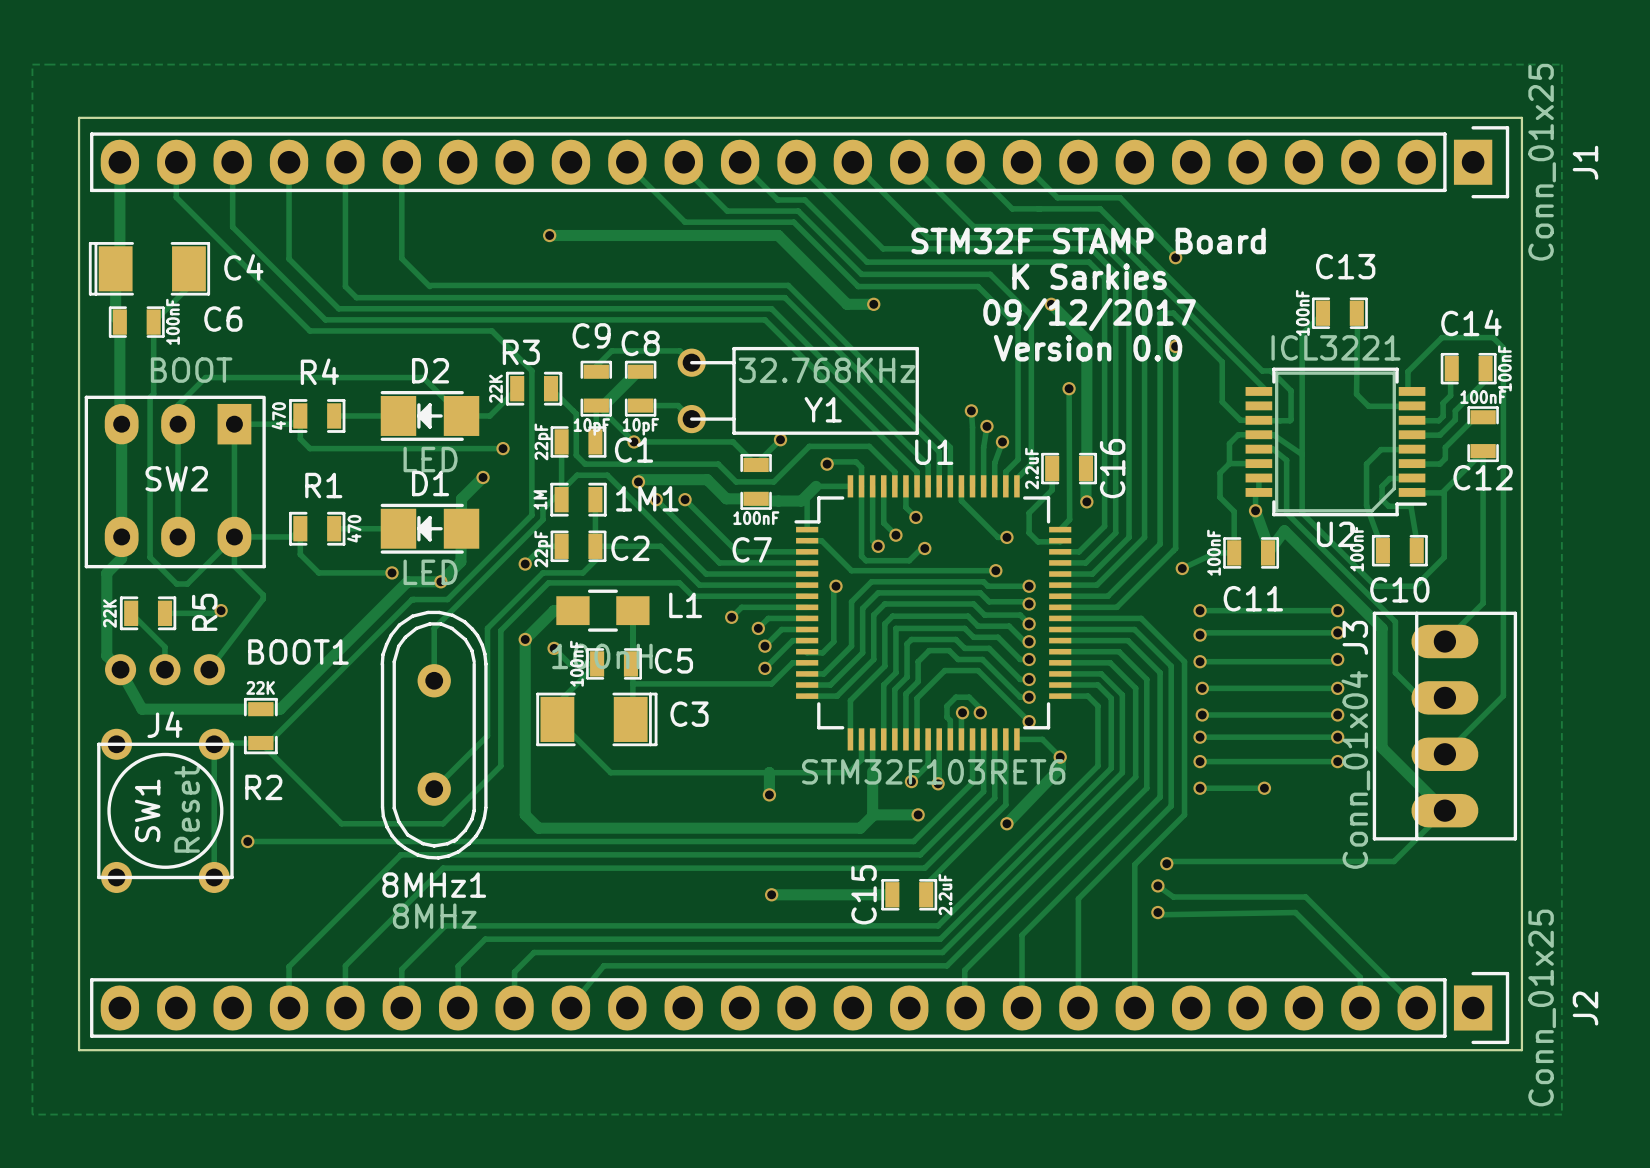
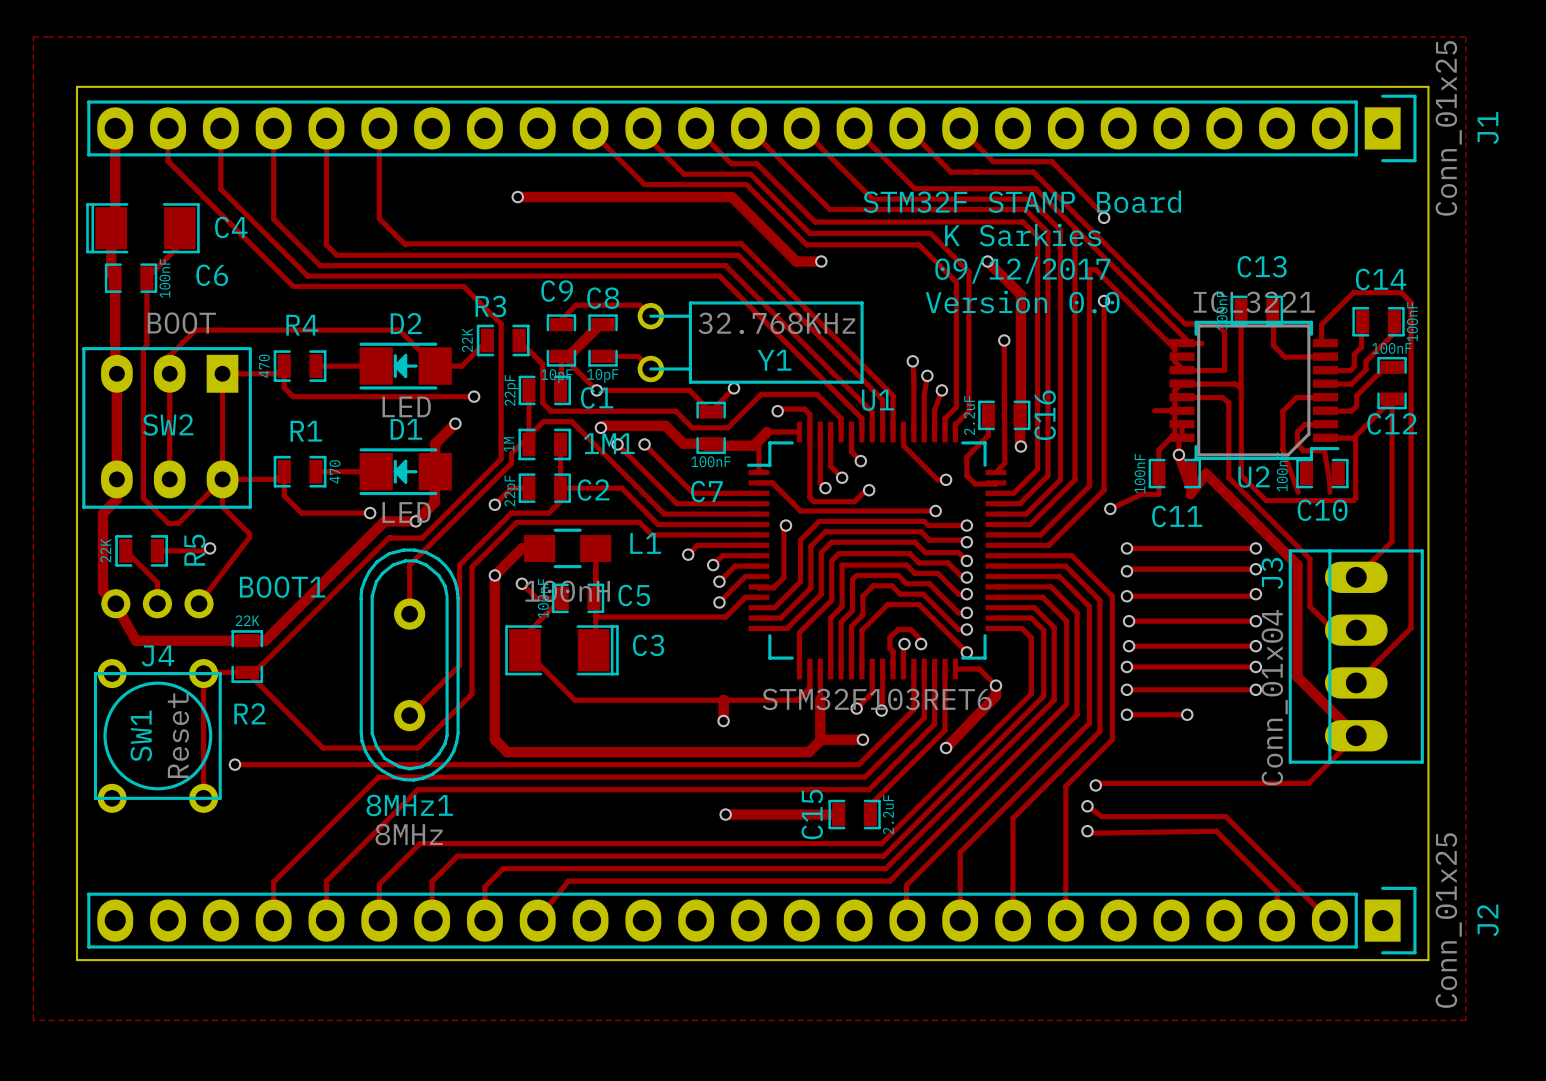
track: (1166, 313) (1173, 313) (1222, 362) (1222, 401) (1240, 420) (1258, 420) -> (1095, 269) (1174, 348) (1174, 361) (1184, 370)
track: (1322, 313) (1302, 334) (1302, 512) (1322, 532) -> none
C13 position: (1339, 313) -> (1256, 310)
track: (1356, 313) (1356, 394) -> (1272, 310) (1273, 345)
track: none -> (1241, 310) (1241, 388)
track: (1271, 370) (1291, 390) (1290, 420) -> (1193, 323) (1216, 323) (1224, 332) (1224, 369) (1211, 370)
track: none -> (1190, 343) (1202, 343)
track: (1272, 434) (1238, 434) (1229, 443) (1229, 463) (1220, 473) (1220, 497) (1234, 511) -> (1241, 475) (1241, 388) (1235, 384) (1181, 384) (1174, 390) (1174, 434) (1158, 449) (1158, 455)
track: (1271, 435) (1275, 435) (1273, 435) (1302, 454) -> none
track: (1257, 448) (1272, 448) (1286, 460) (1286, 512) (1308, 535) -> (1190, 397) (1222, 397) (1228, 402) (1228, 477)
C10 position: (1399, 550) -> (1322, 473)
C11 position: (1251, 552) -> (1174, 473)
track: (1348, 559) (1375, 586) (1415, 586) (1442, 559) -> (1266, 500) (1353, 500)

